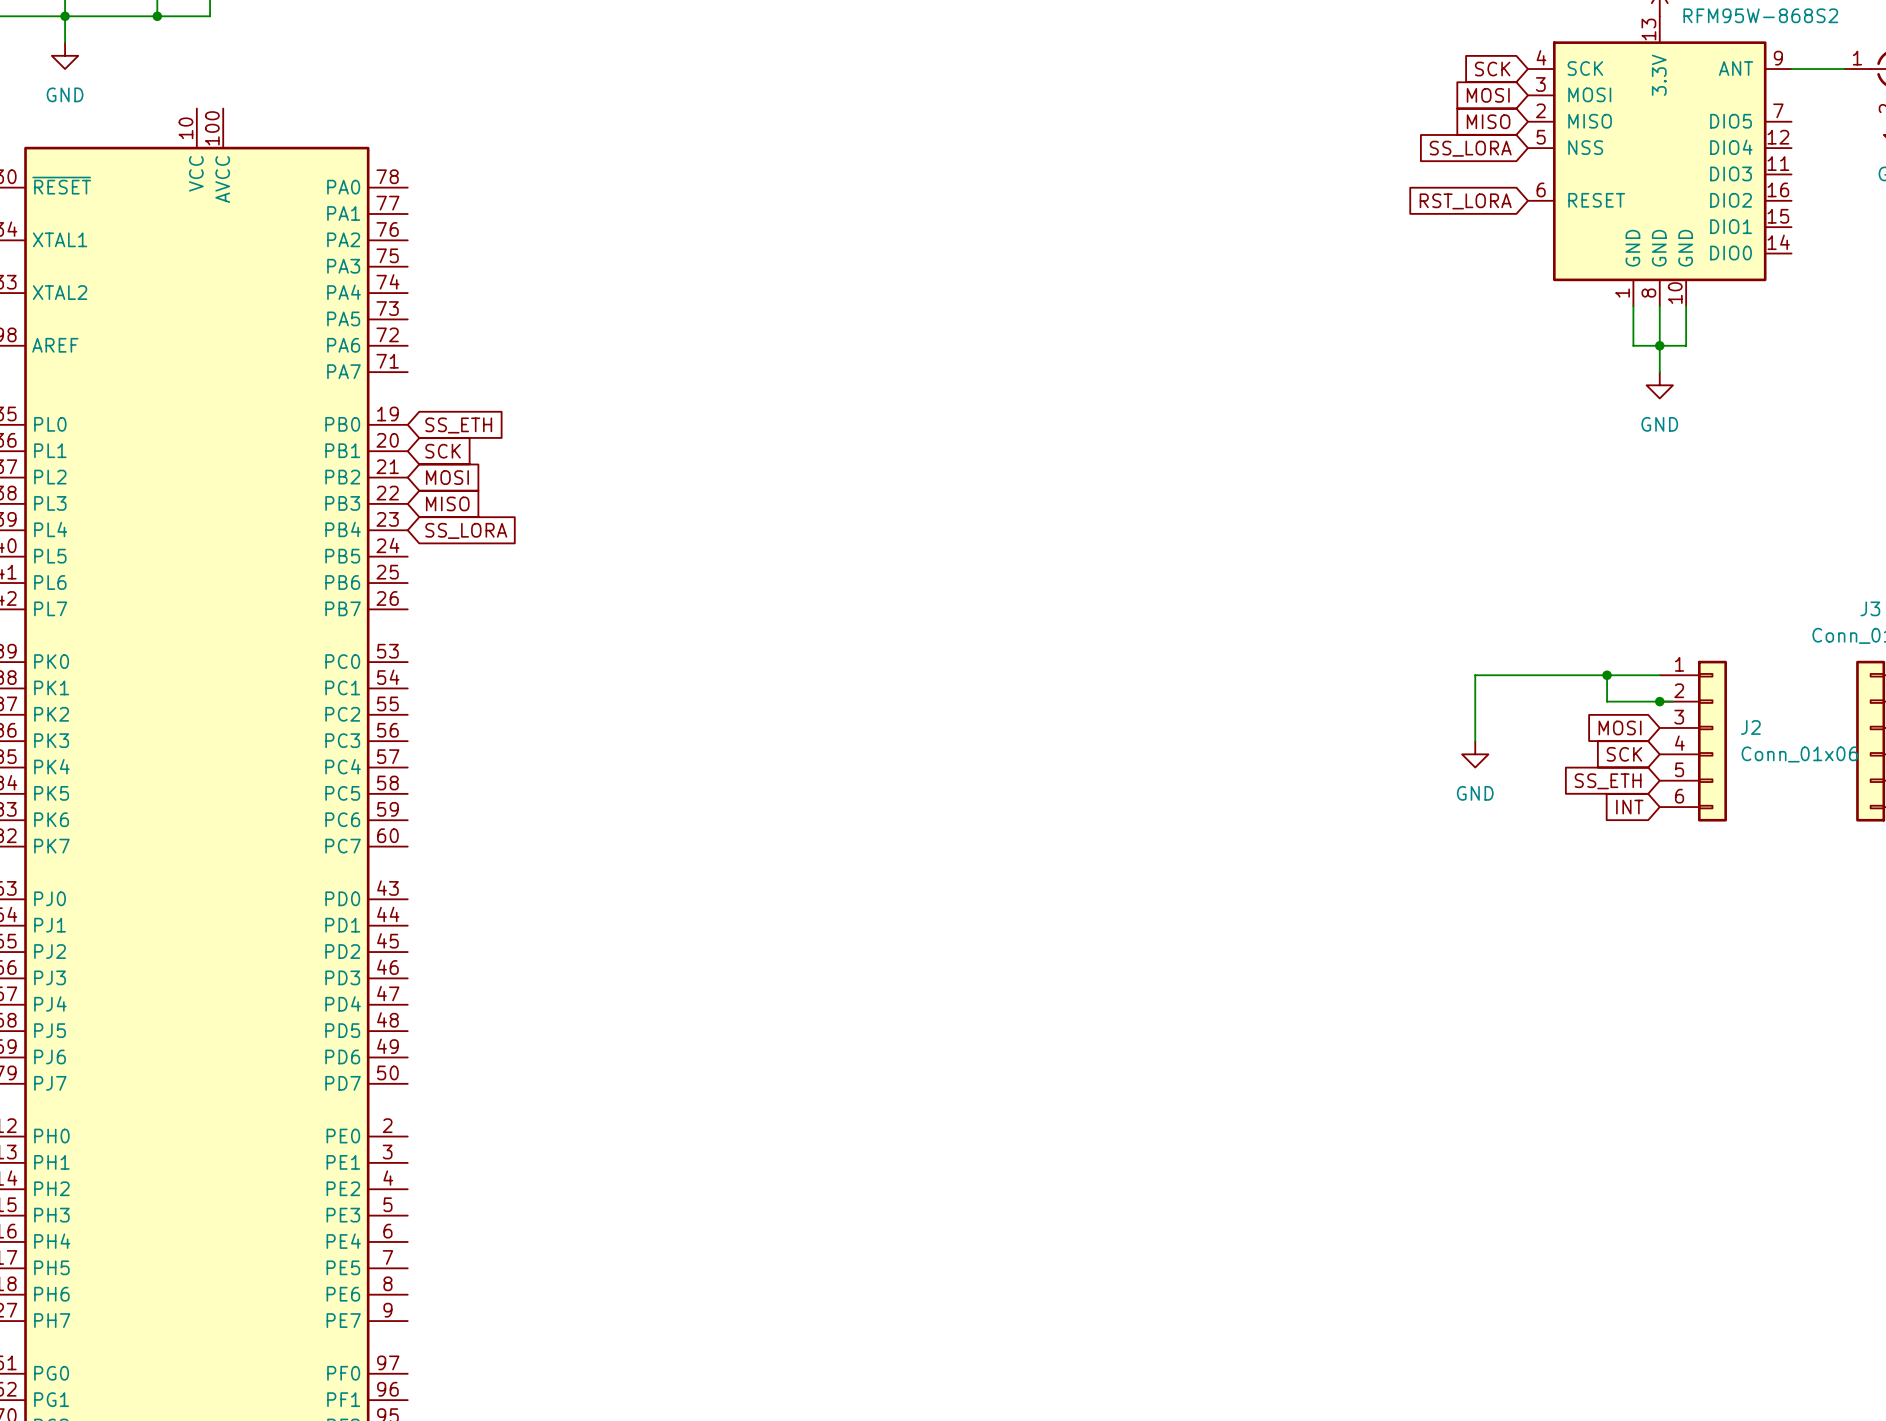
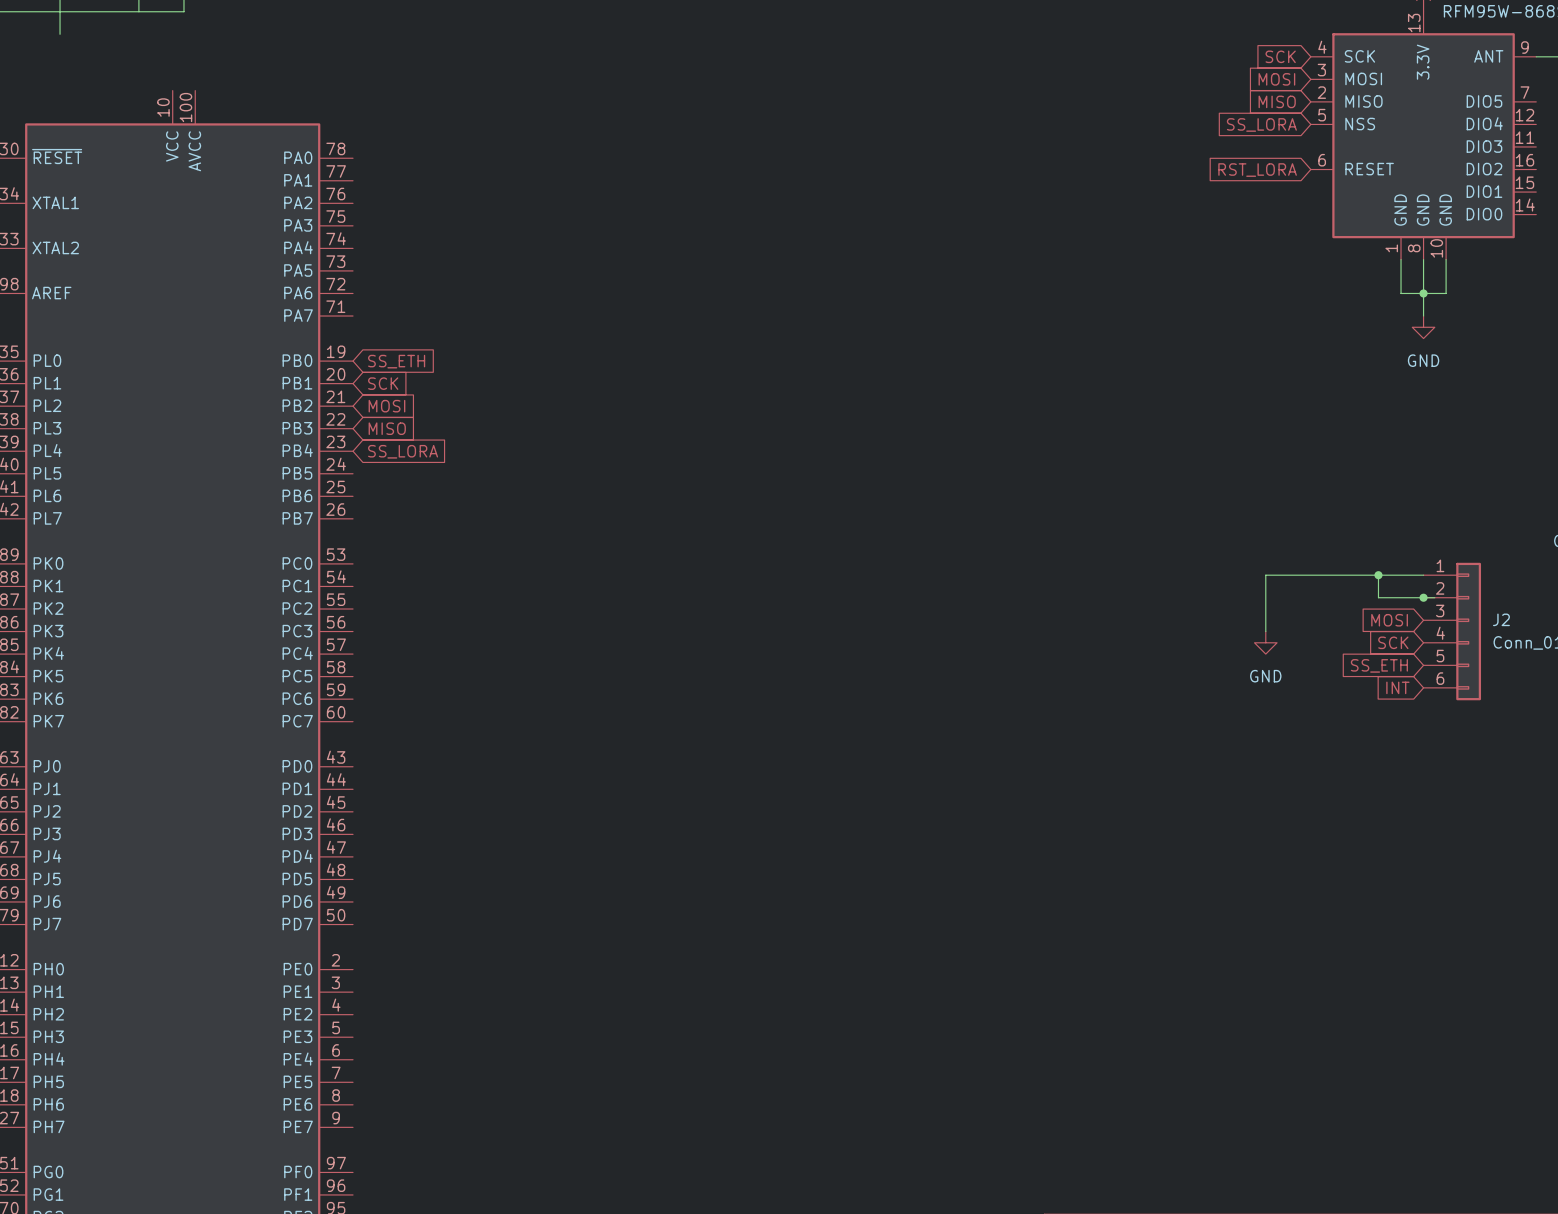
junction: (65, 16) -> none
junction: (157, 16) -> none
power symbol: GND (65, 55) -> none

